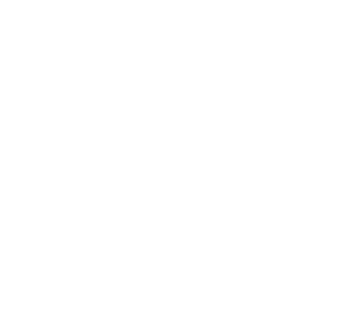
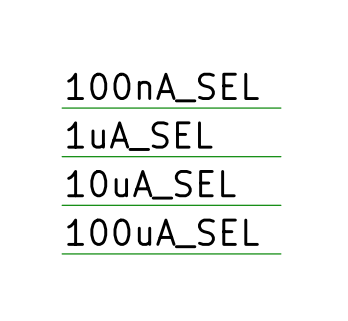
label: none -> 100nA_SEL (163, 87)
wire: none -> (62, 108) (280, 108)
label: none -> 1uA_SEL (139, 136)
wire: none -> (62, 156) (280, 156)
label: none -> 10uA_SEL (151, 184)
wire: none -> (62, 205) (280, 205)
label: none -> 100uA_SEL (163, 233)
wire: none -> (62, 253) (280, 253)

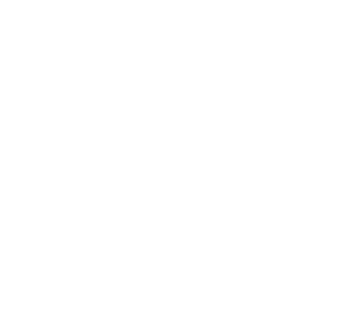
label: 100nA_SEL (163, 87) -> none
wire: (62, 108) (280, 108) -> none
label: 1uA_SEL (139, 136) -> none
wire: (62, 156) (280, 156) -> none
label: 10uA_SEL (151, 184) -> none
wire: (62, 205) (280, 205) -> none
label: 100uA_SEL (163, 233) -> none
wire: (62, 253) (280, 253) -> none

